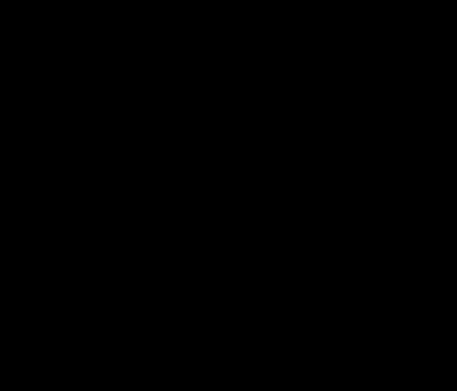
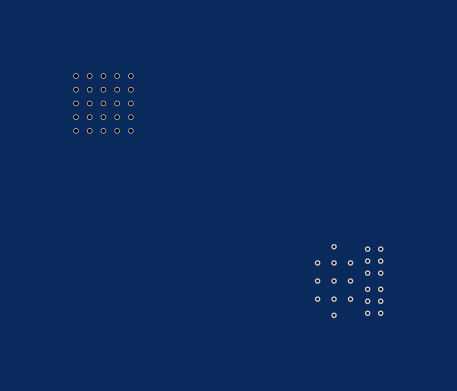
part: none -> (103, 103)
part: none -> (349, 281)

